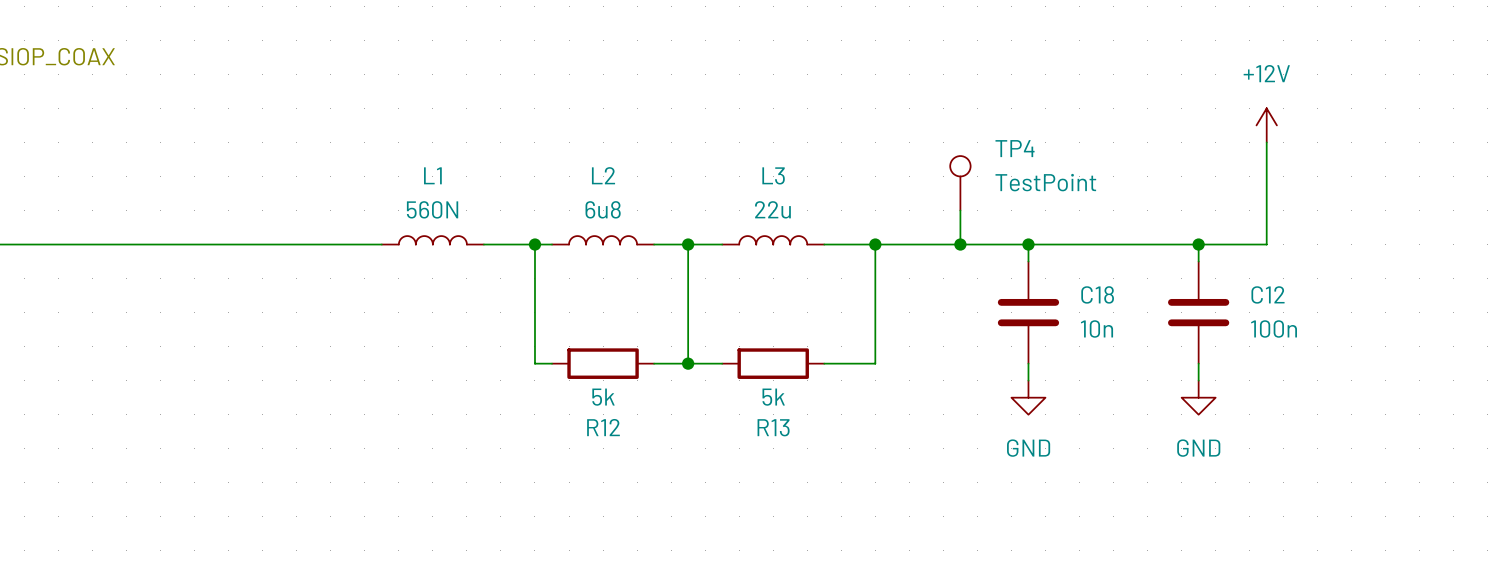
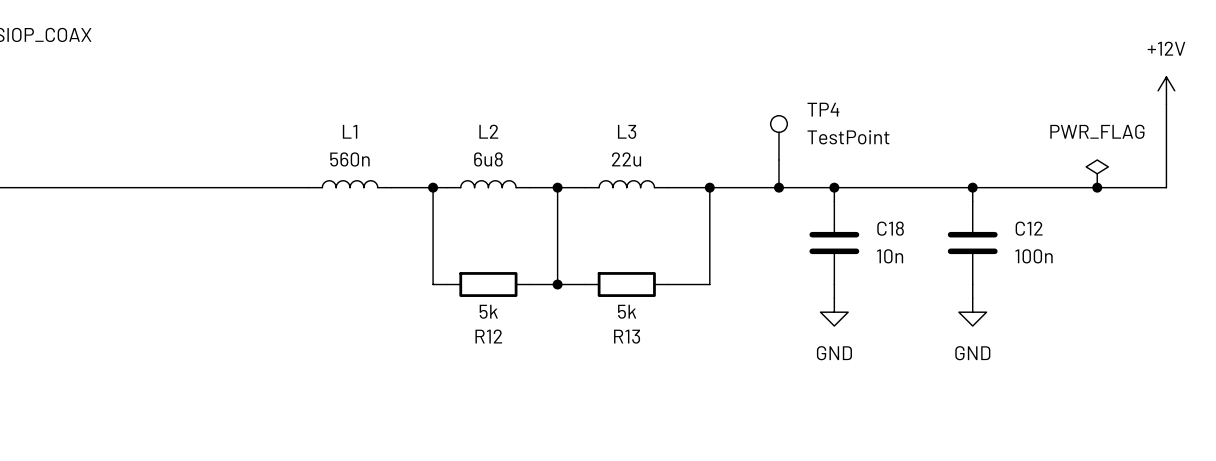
power symbol position: +12V (1266, 125) -> +12V (1166, 90)
wire: (1266, 142) (1266, 244) -> (1166, 104) (1166, 187) (1028, 187)
L1 value: 560N (432, 209) -> 560n (349, 159)
power symbol: none -> PWR_FLAG (1097, 173)
junction: none -> (1097, 187)

